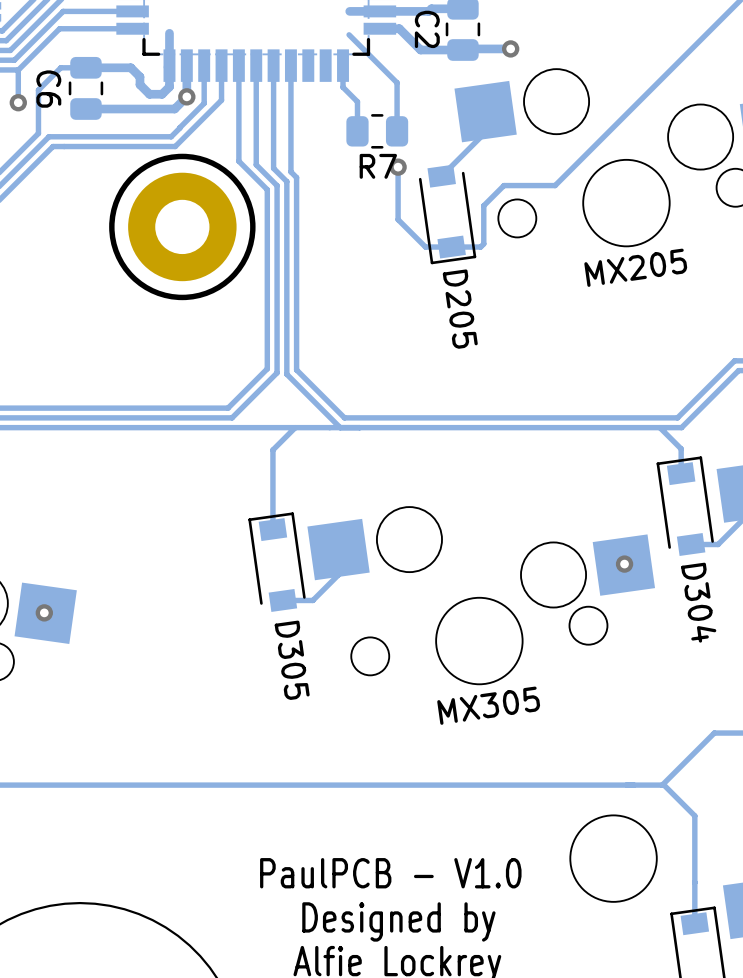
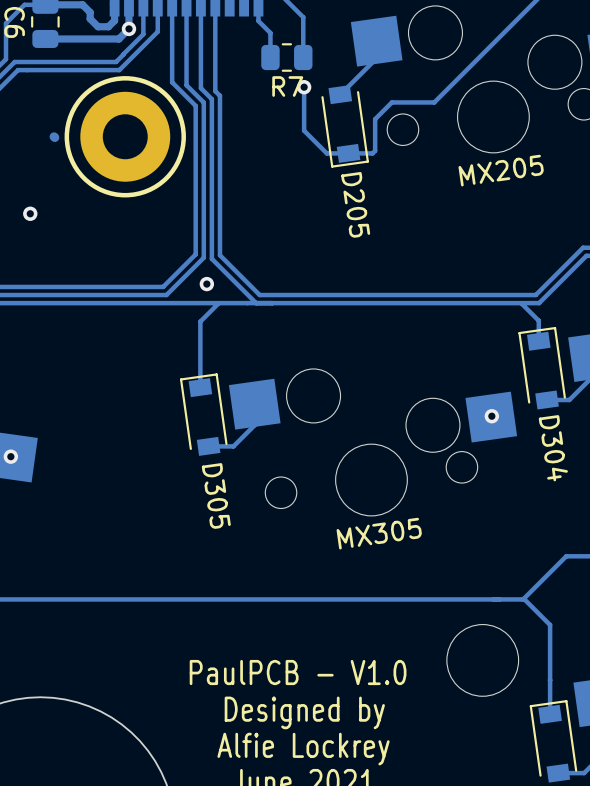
track: none -> (54, 136) (54, 137)
via: none -> (30, 213)
via: none -> (206, 284)

